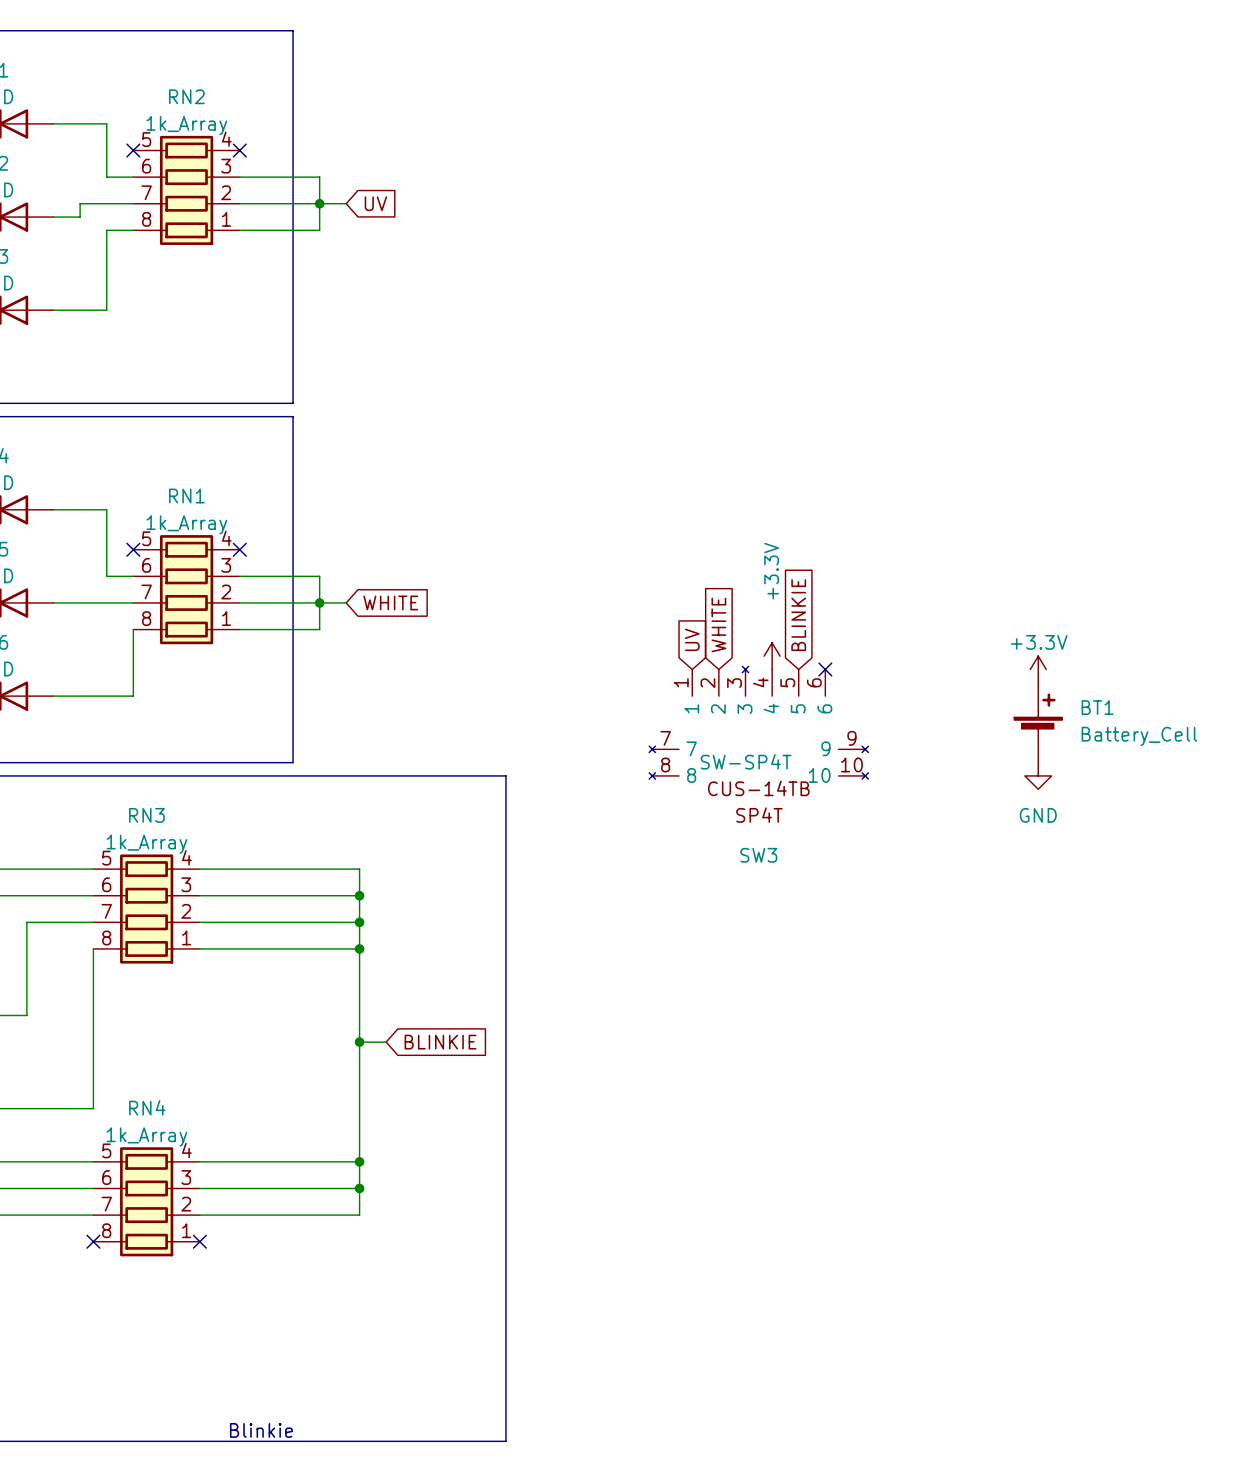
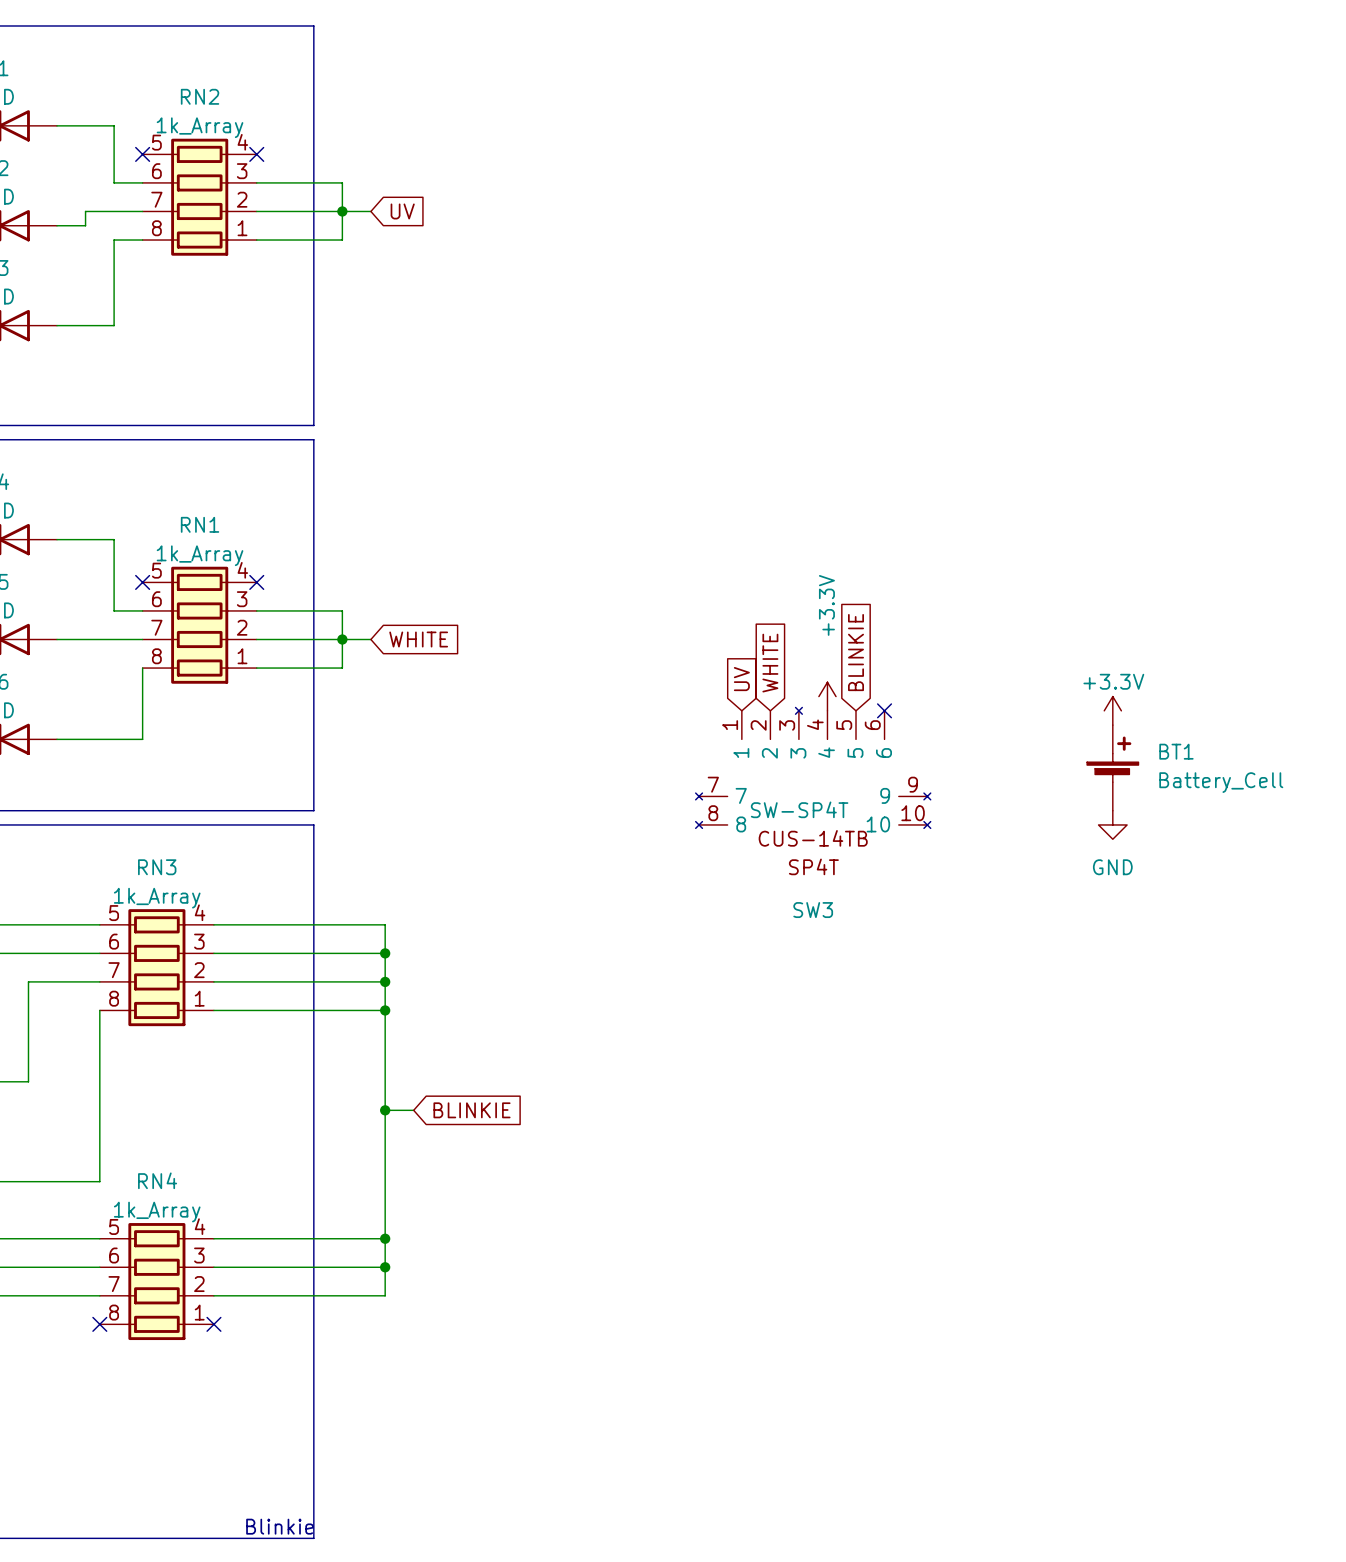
line: (293, 775) (505, 775) (505, 1441) (293, 1441) -> (313, 824) (313, 1538)

